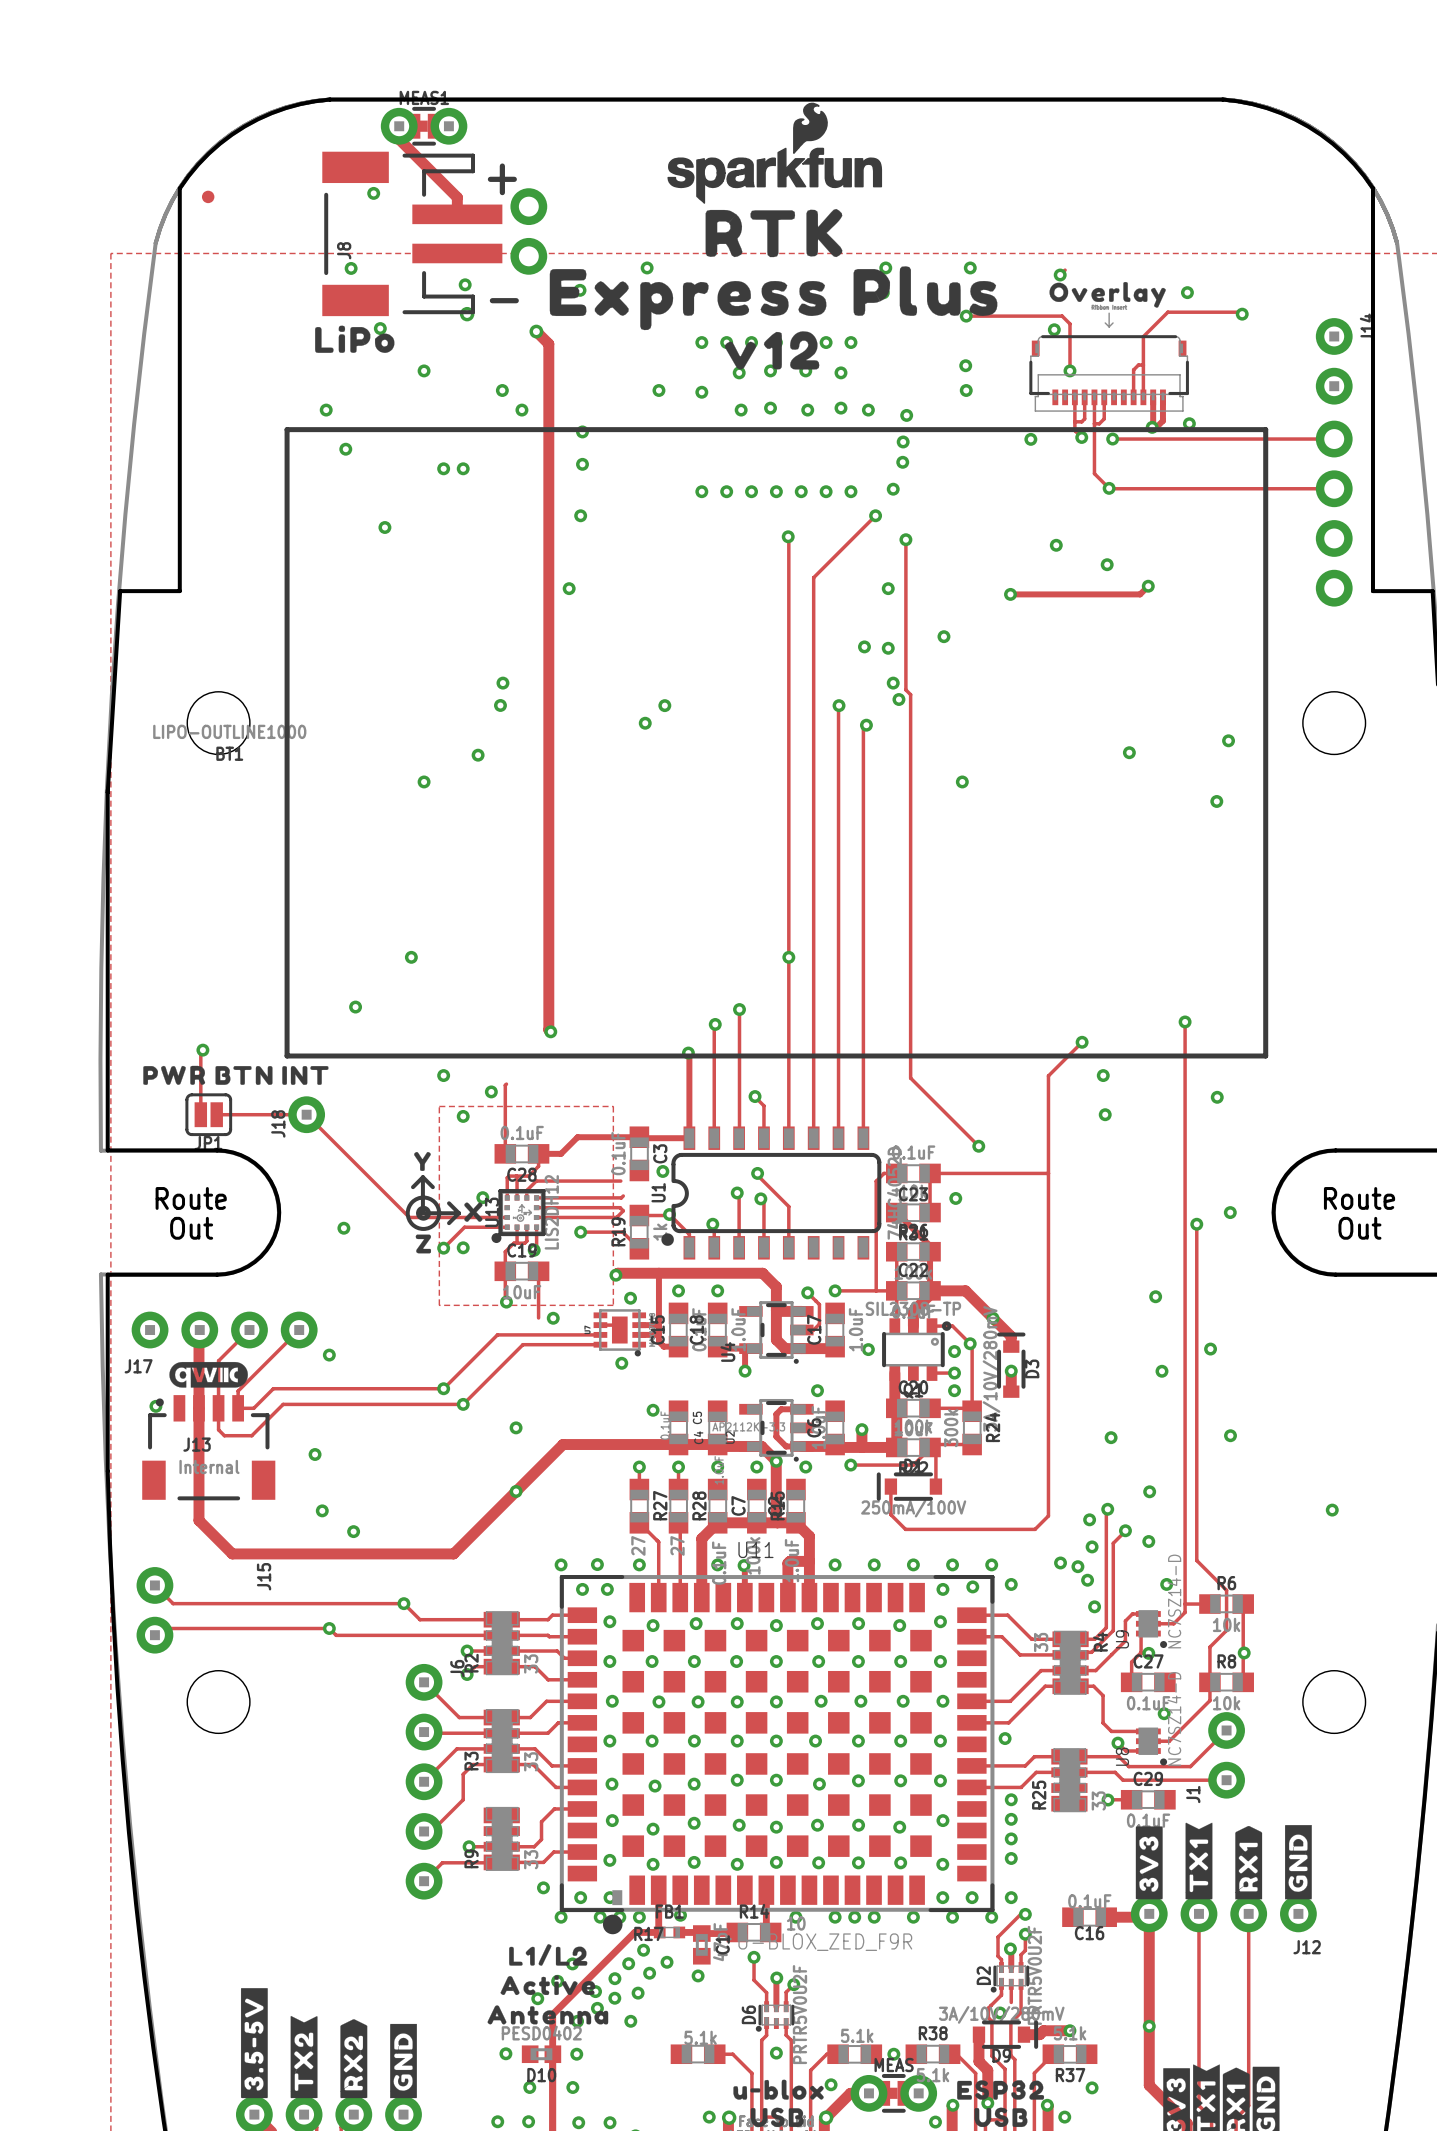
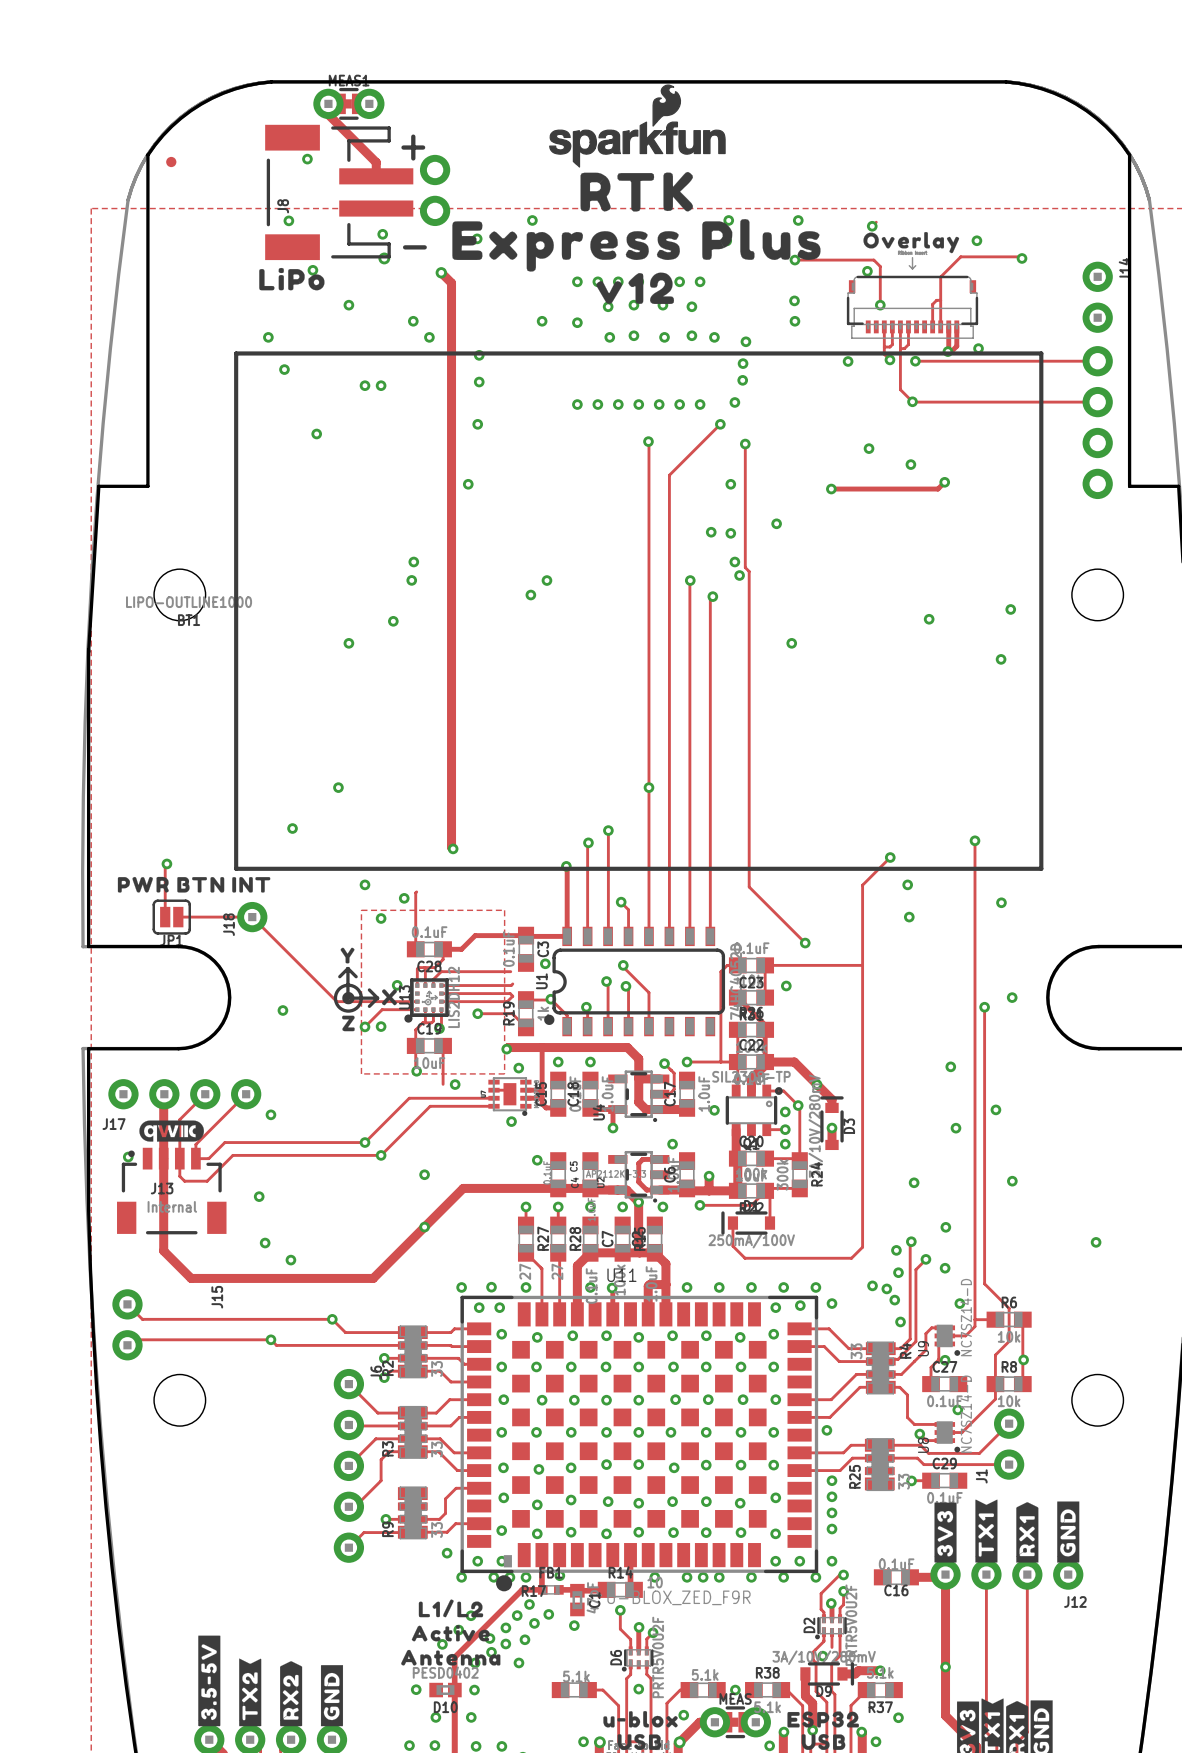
text: Route (191, 1198) -> none
text: Route (1359, 1198) -> none
text: Out (191, 1228) -> none
text: Out (1359, 1228) -> none

